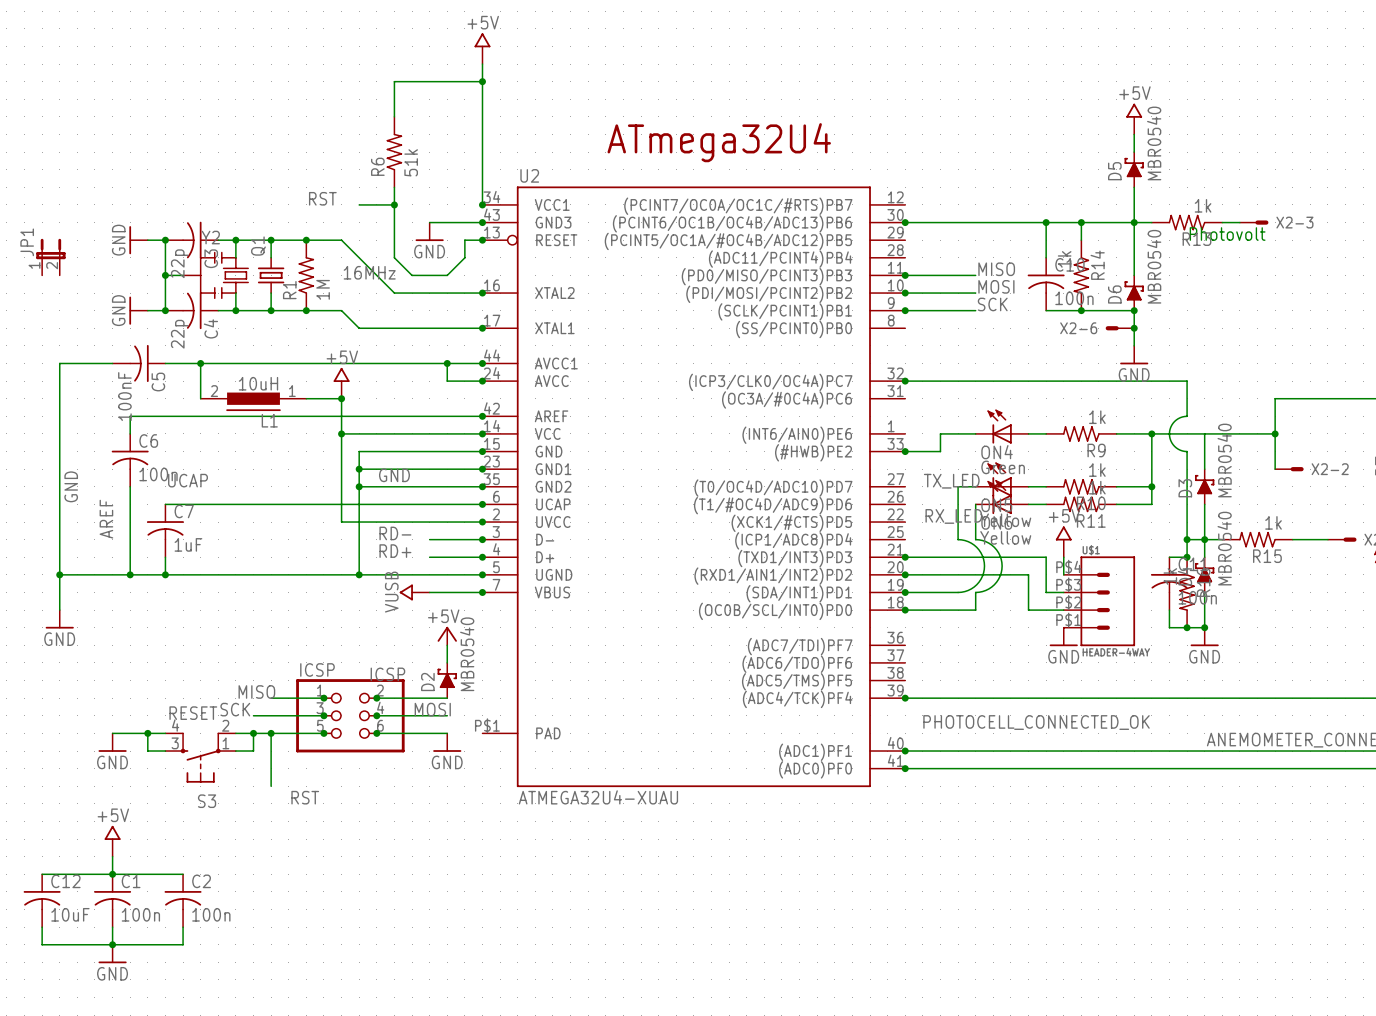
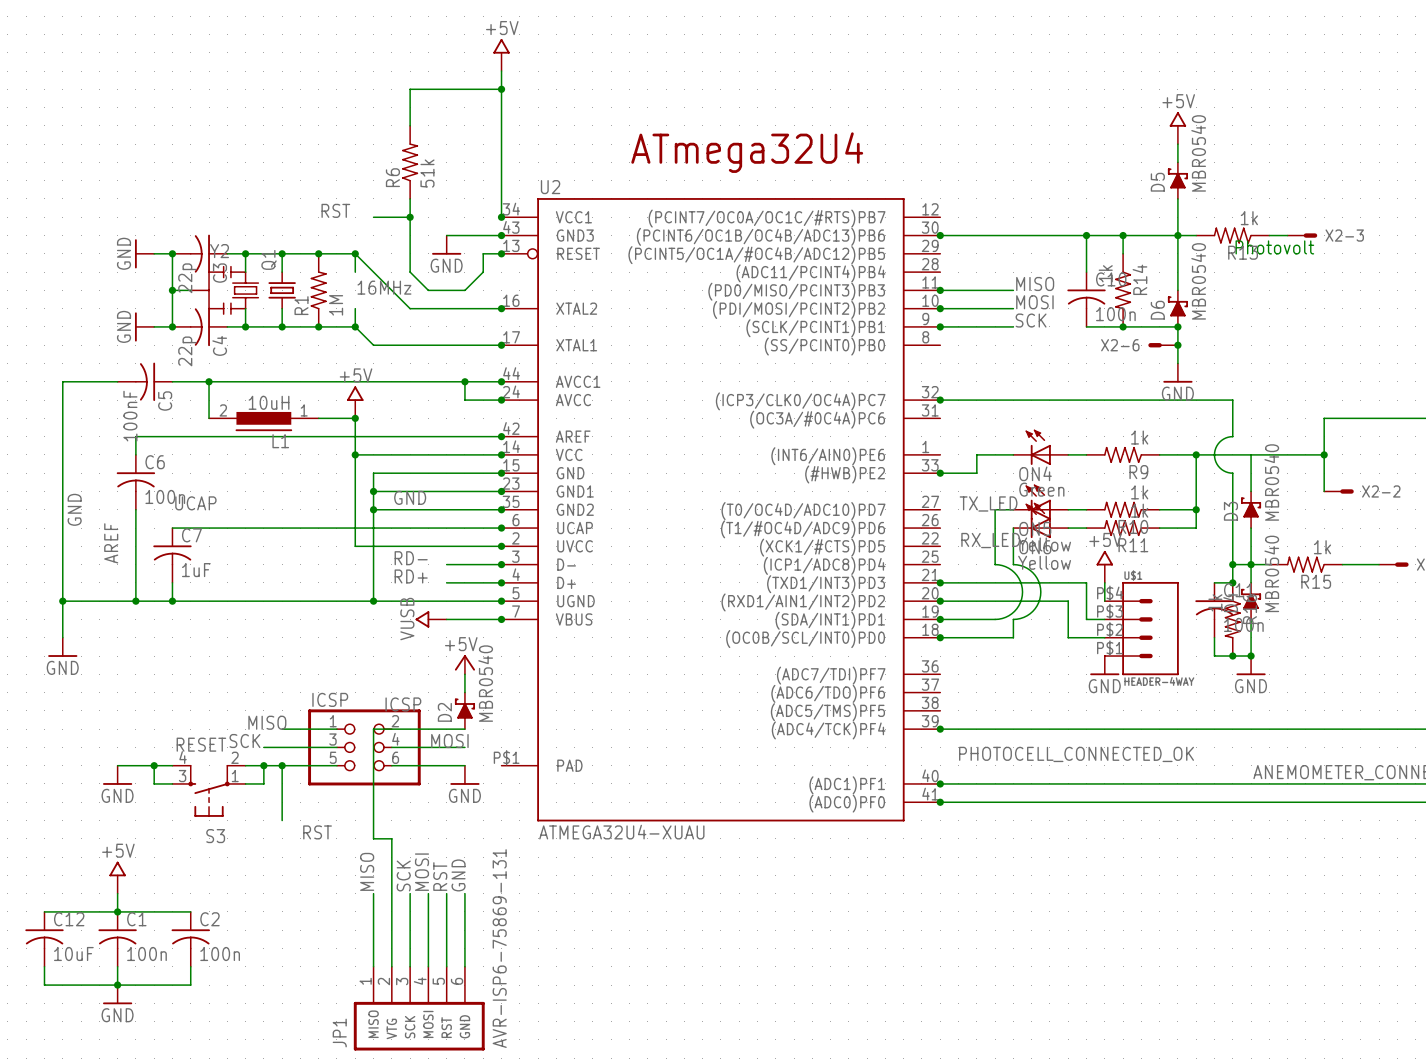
JP1 symbol: [36, 238, 66, 276] -> [353, 966, 485, 1051]
wire: none -> (355, 253) (355, 272)
junction: none -> (355, 253)
JP1 name position: JP1 (27, 242) -> JP1 (339, 1033)
wire: none -> (355, 308) (355, 326)
junction: none -> (355, 326)
junction: (323, 698) -> none
wire: none -> (391, 729) (373, 729) (373, 838) (391, 838) (391, 966)
junction: (376, 698) -> none
junction: (323, 715) -> none
junction: (376, 715) -> none
junction: (323, 733) -> none
junction: (376, 733) -> none
label: none -> MISO (367, 871)
label: none -> MOSI (422, 872)
label: none -> SCK (403, 875)
label: none -> GND (458, 875)
label: none -> RST (440, 876)
wire: none -> (373, 893) (373, 966)
wire: none -> (410, 893) (410, 966)
wire: none -> (428, 893) (428, 966)
wire: none -> (446, 893) (446, 966)
wire: none -> (464, 893) (464, 966)
JP1 value: none -> AVR-ISP6-75869-131 (499, 948)

